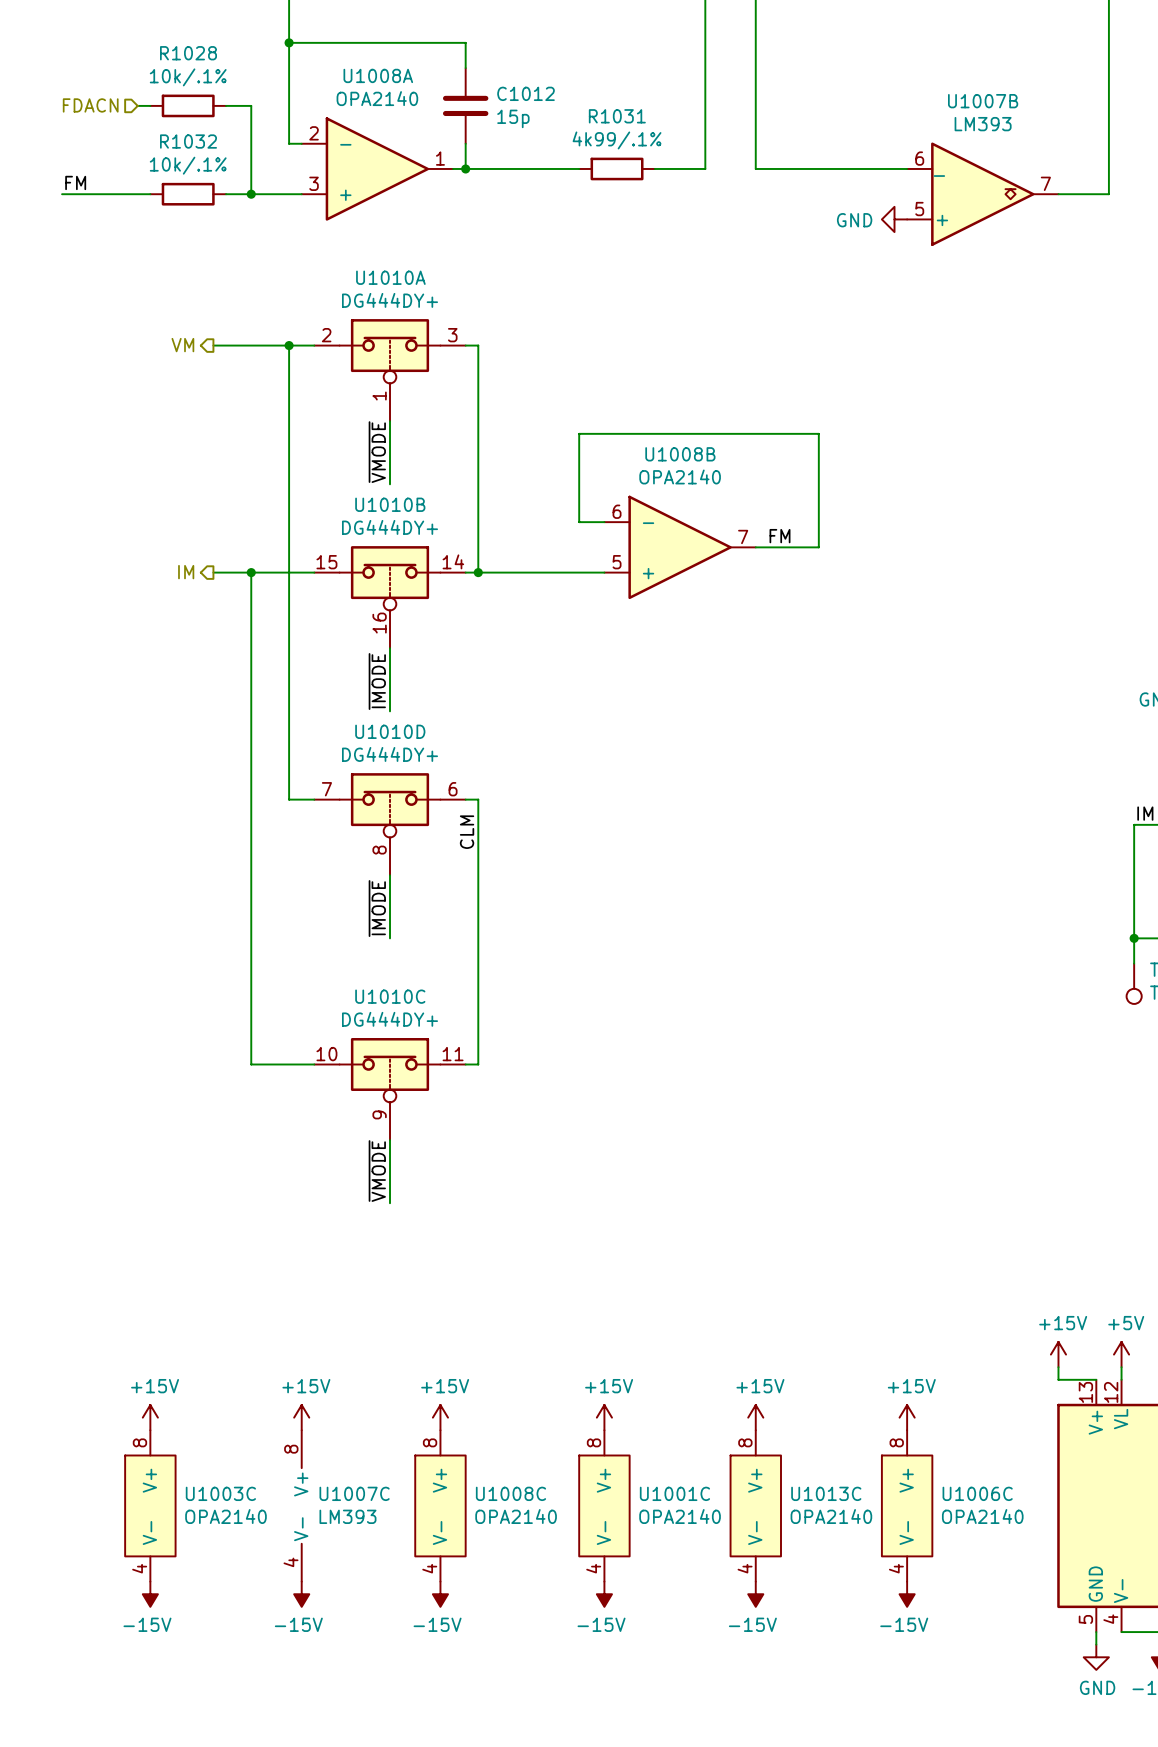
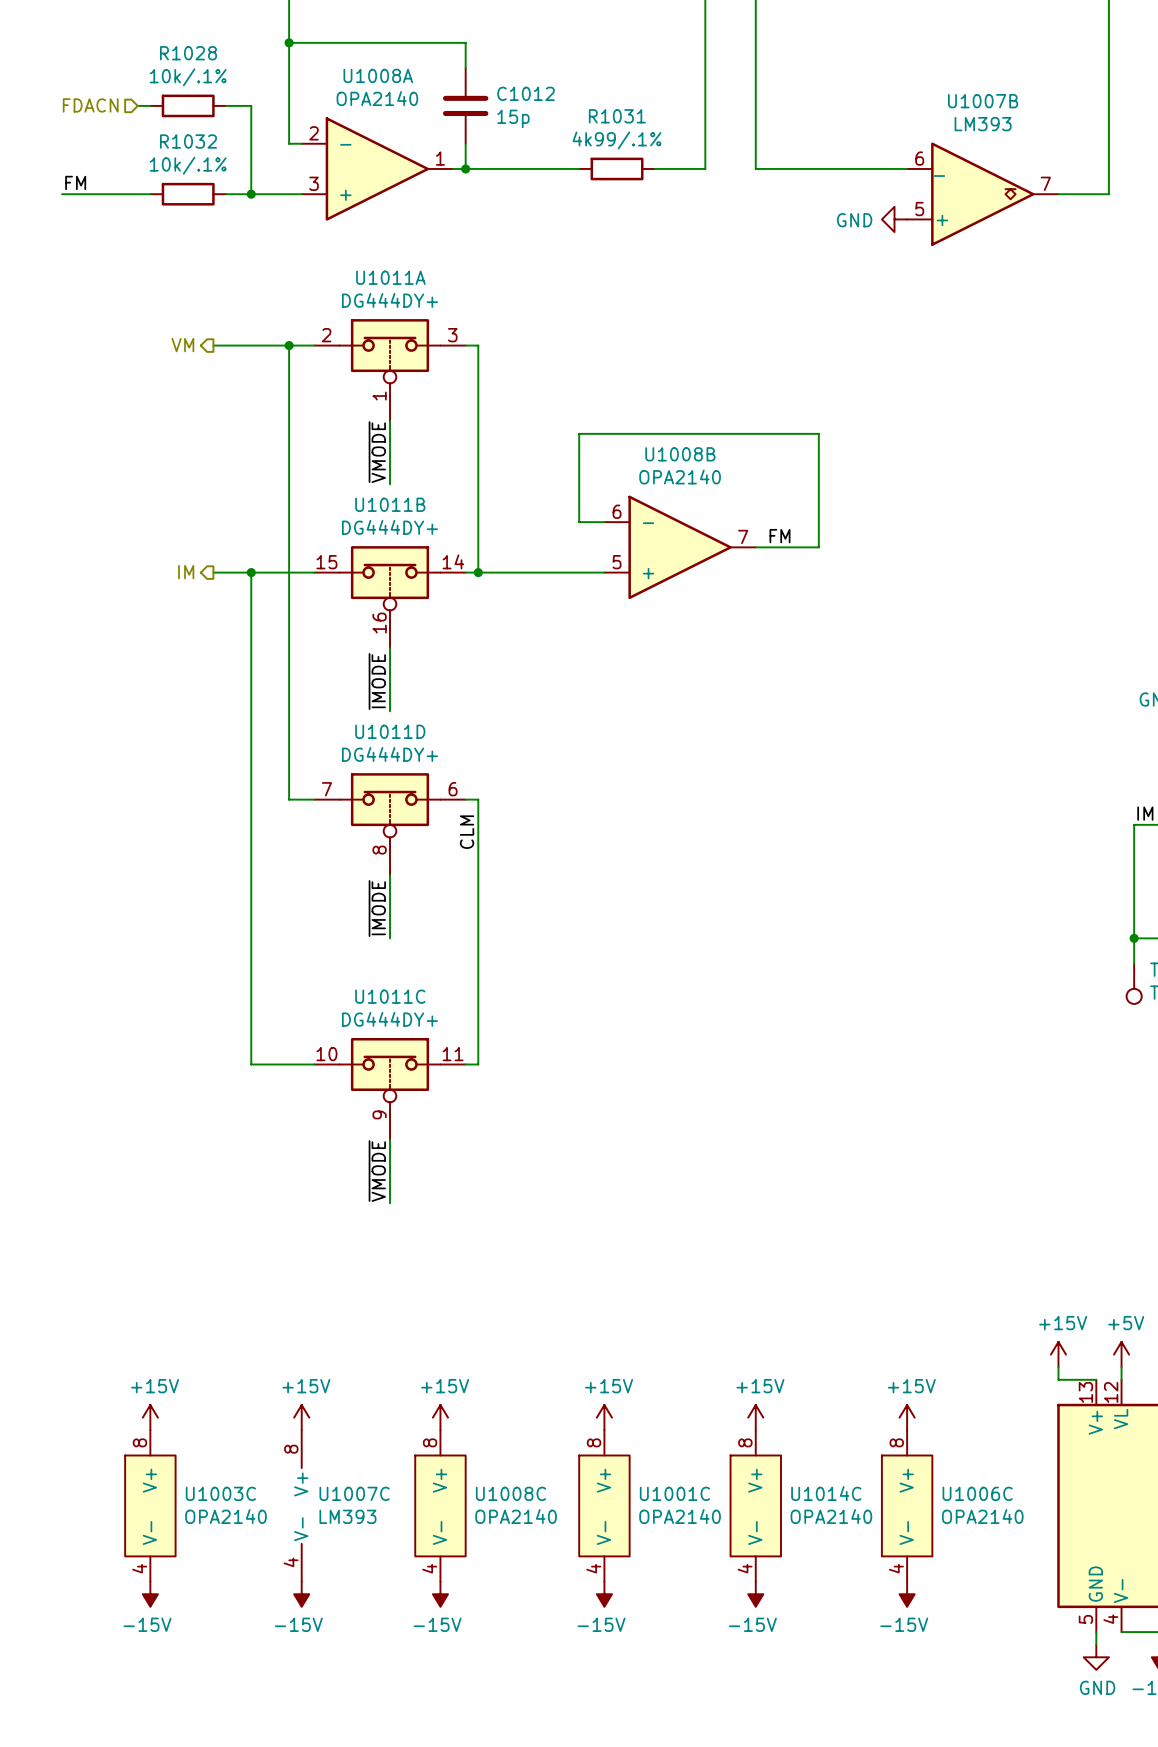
U1010A name: U1010A (390, 277) -> U1011A (390, 277)
U1010B name: U1010B (390, 504) -> U1011B (390, 504)
U1010D name: U1010D (390, 731) -> U1011D (390, 731)
U1010C name: U1010C (390, 996) -> U1011C (390, 996)
U1013C name: U1013C (826, 1493) -> U1014C (826, 1493)

